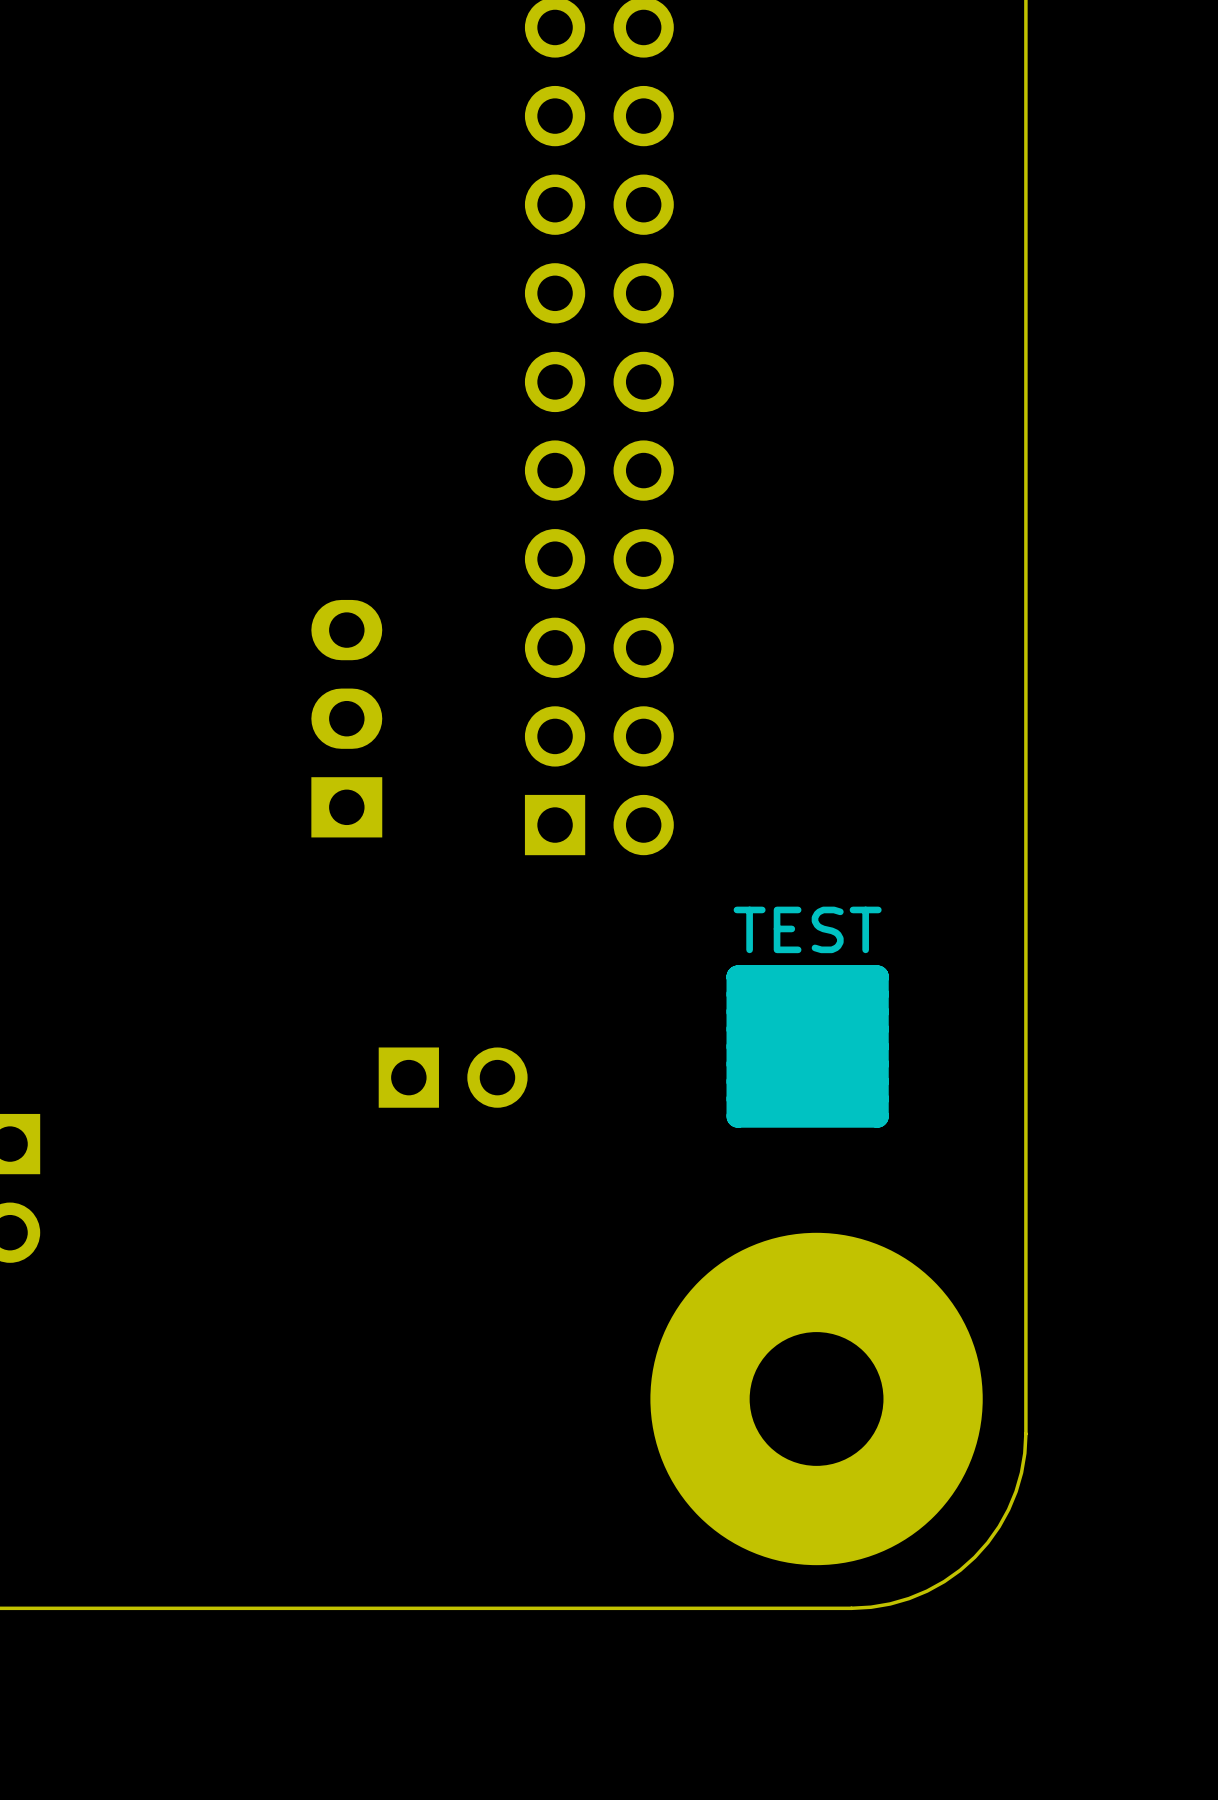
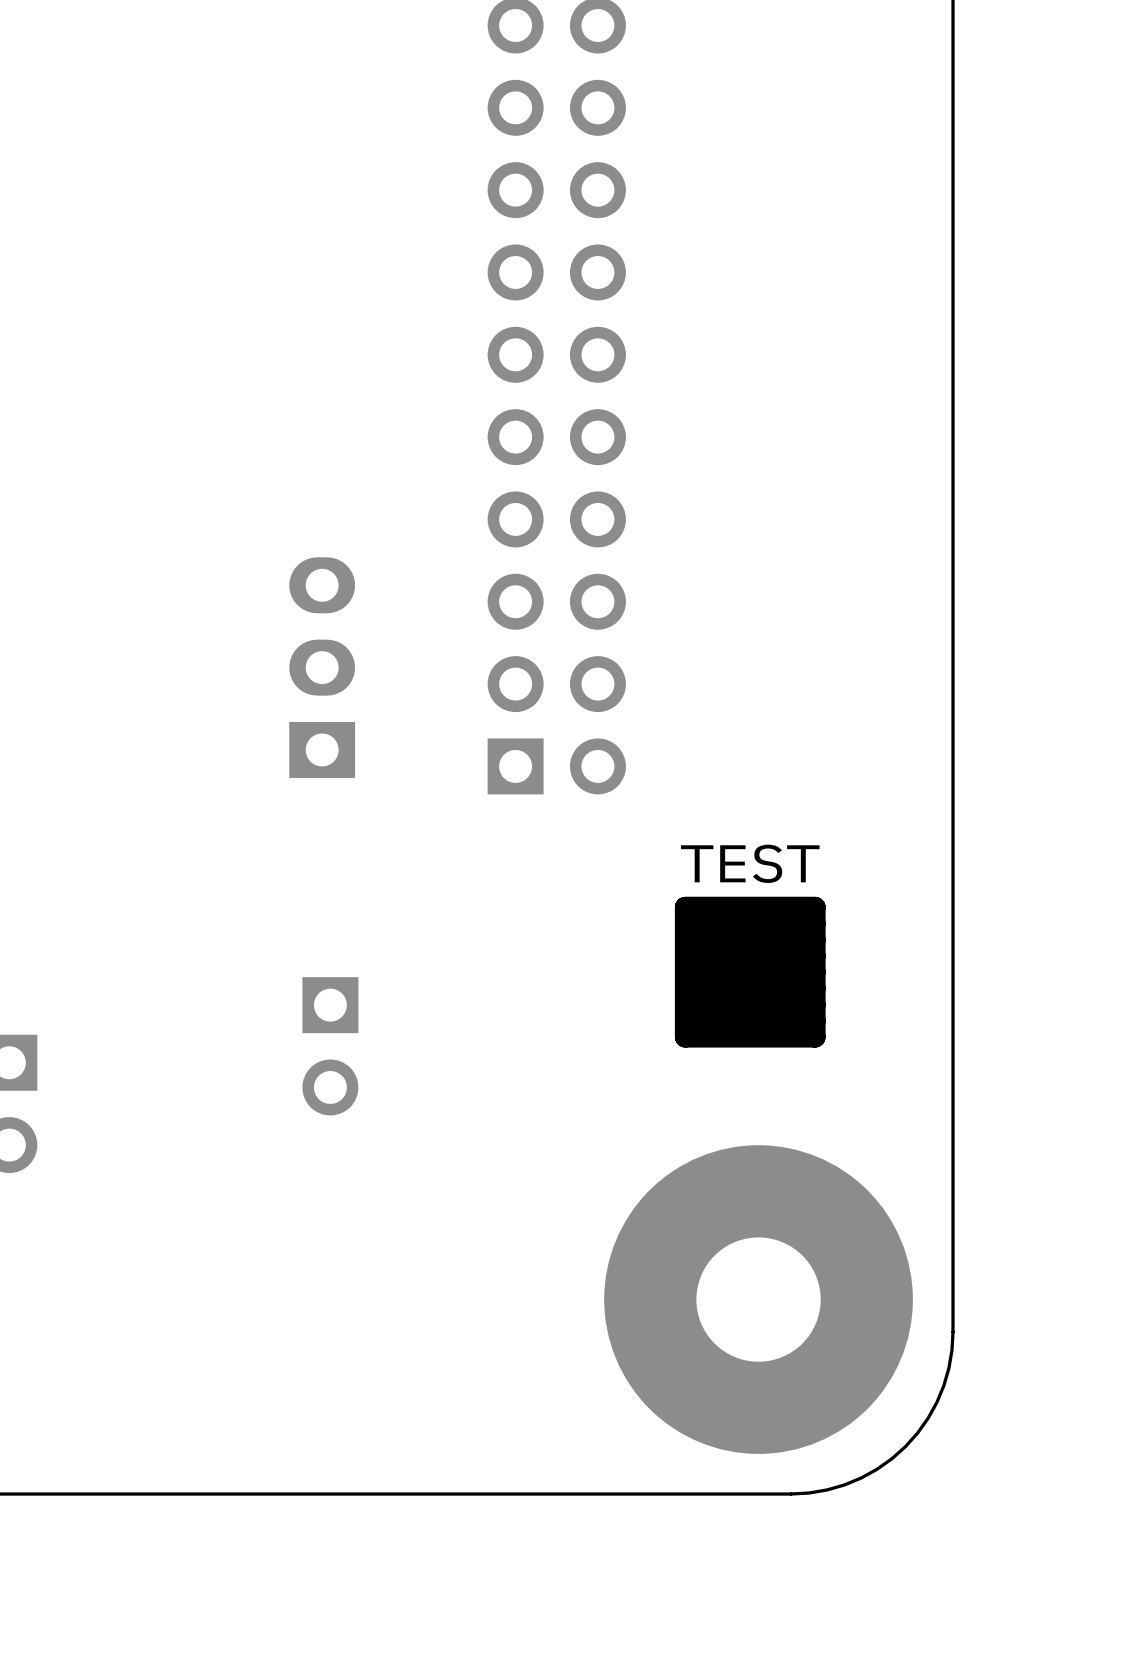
part rotation: 0° (453, 1077) -> 90° clockwise (330, 1046)
part position: (453, 1077) -> (330, 1046)

